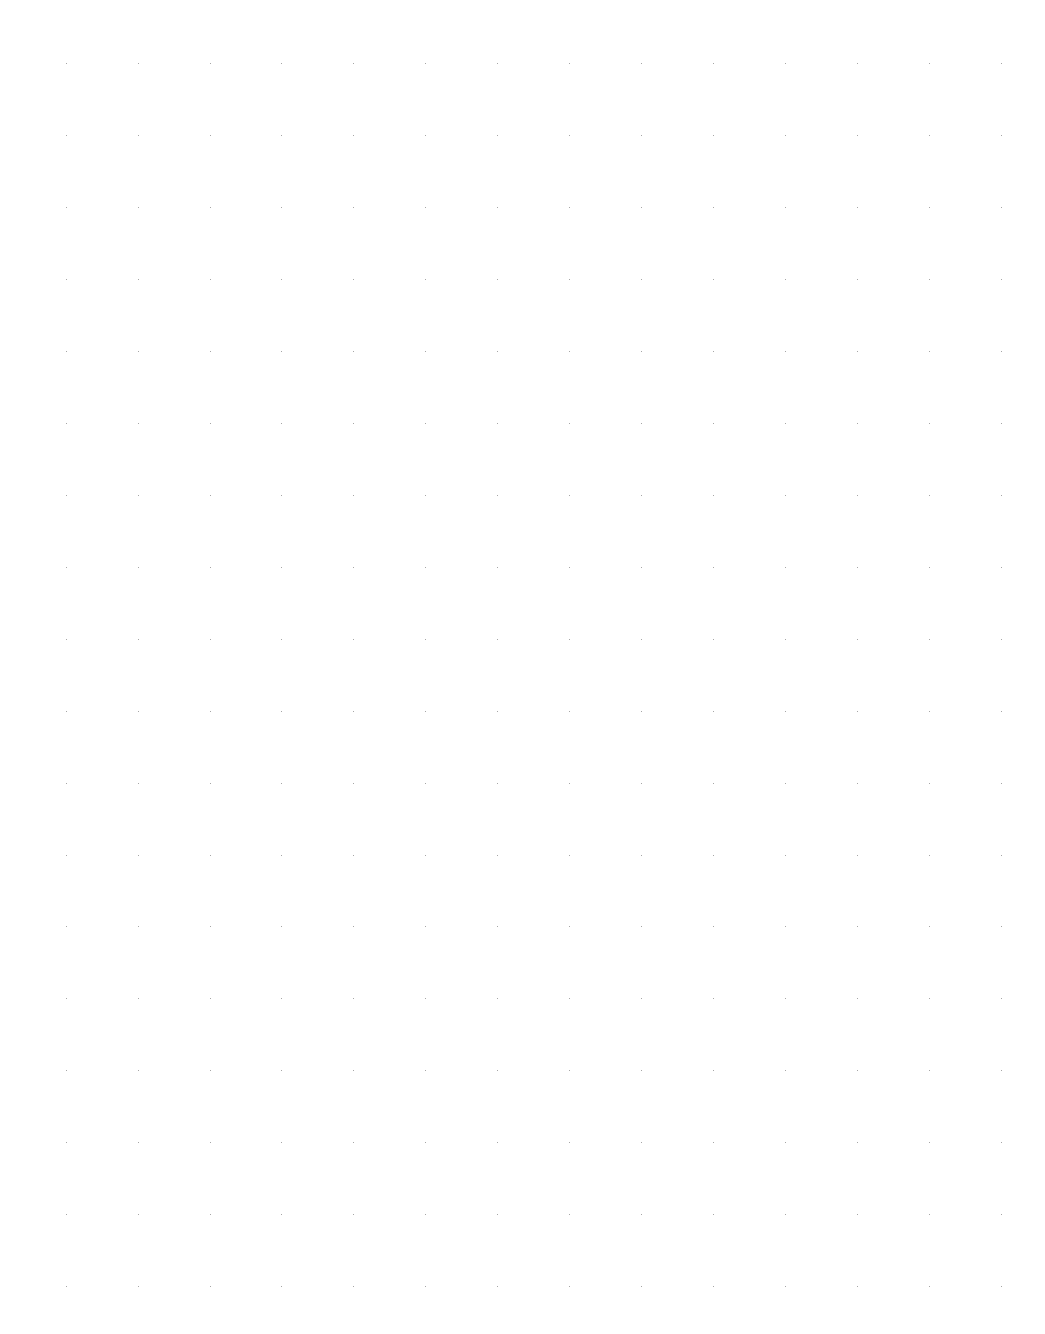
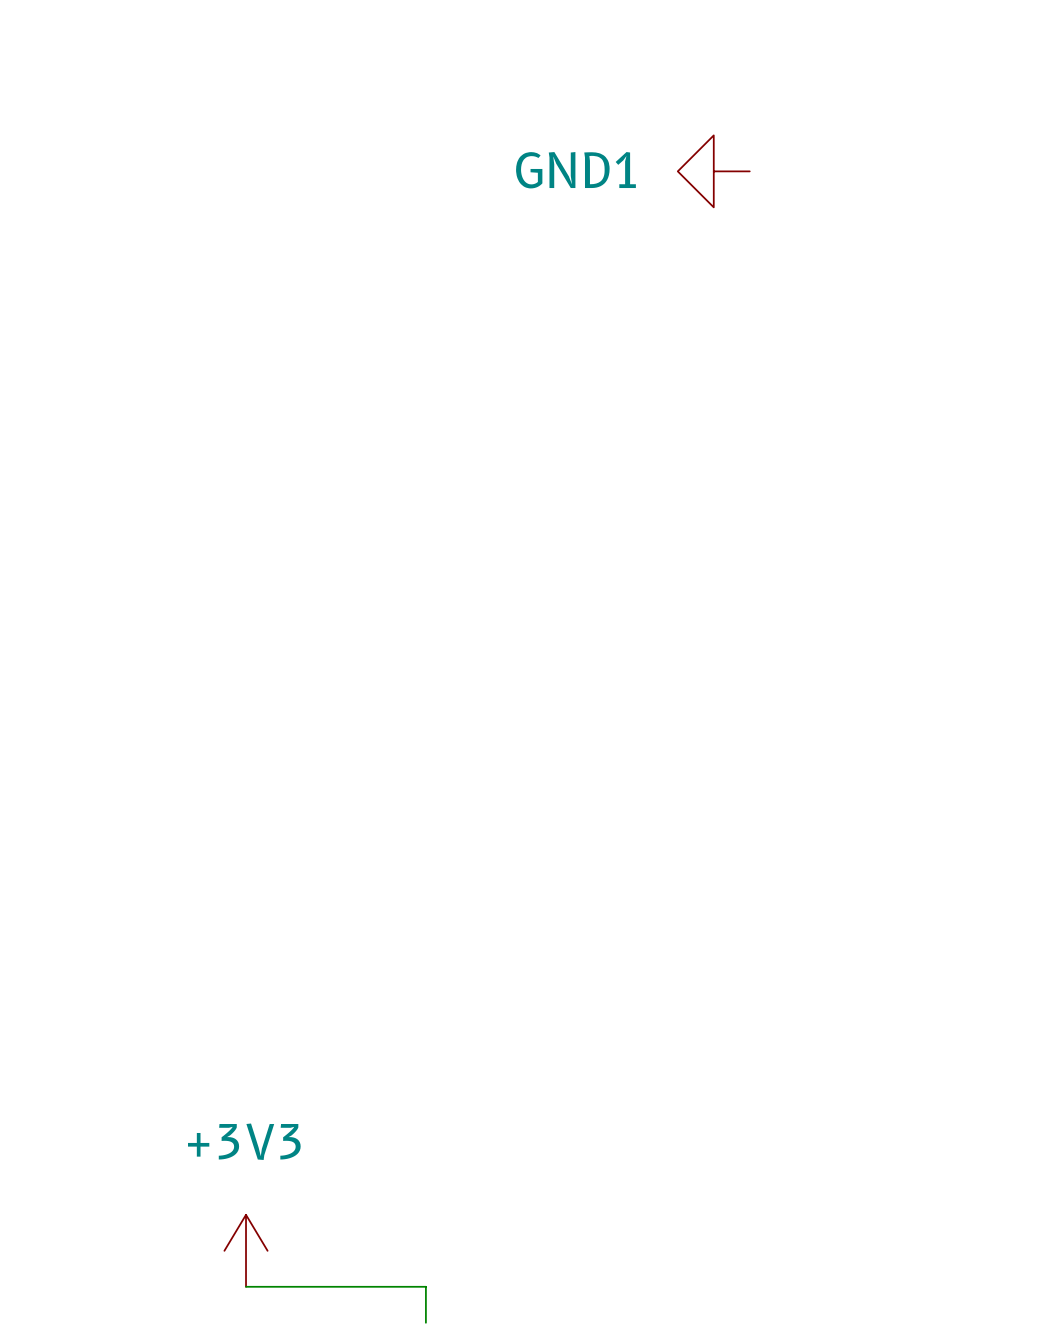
power symbol: none -> GND1 (713, 171)
power symbol: none -> +3V3 (246, 1250)
wire: none -> (246, 1286) (425, 1286) (425, 1322)

